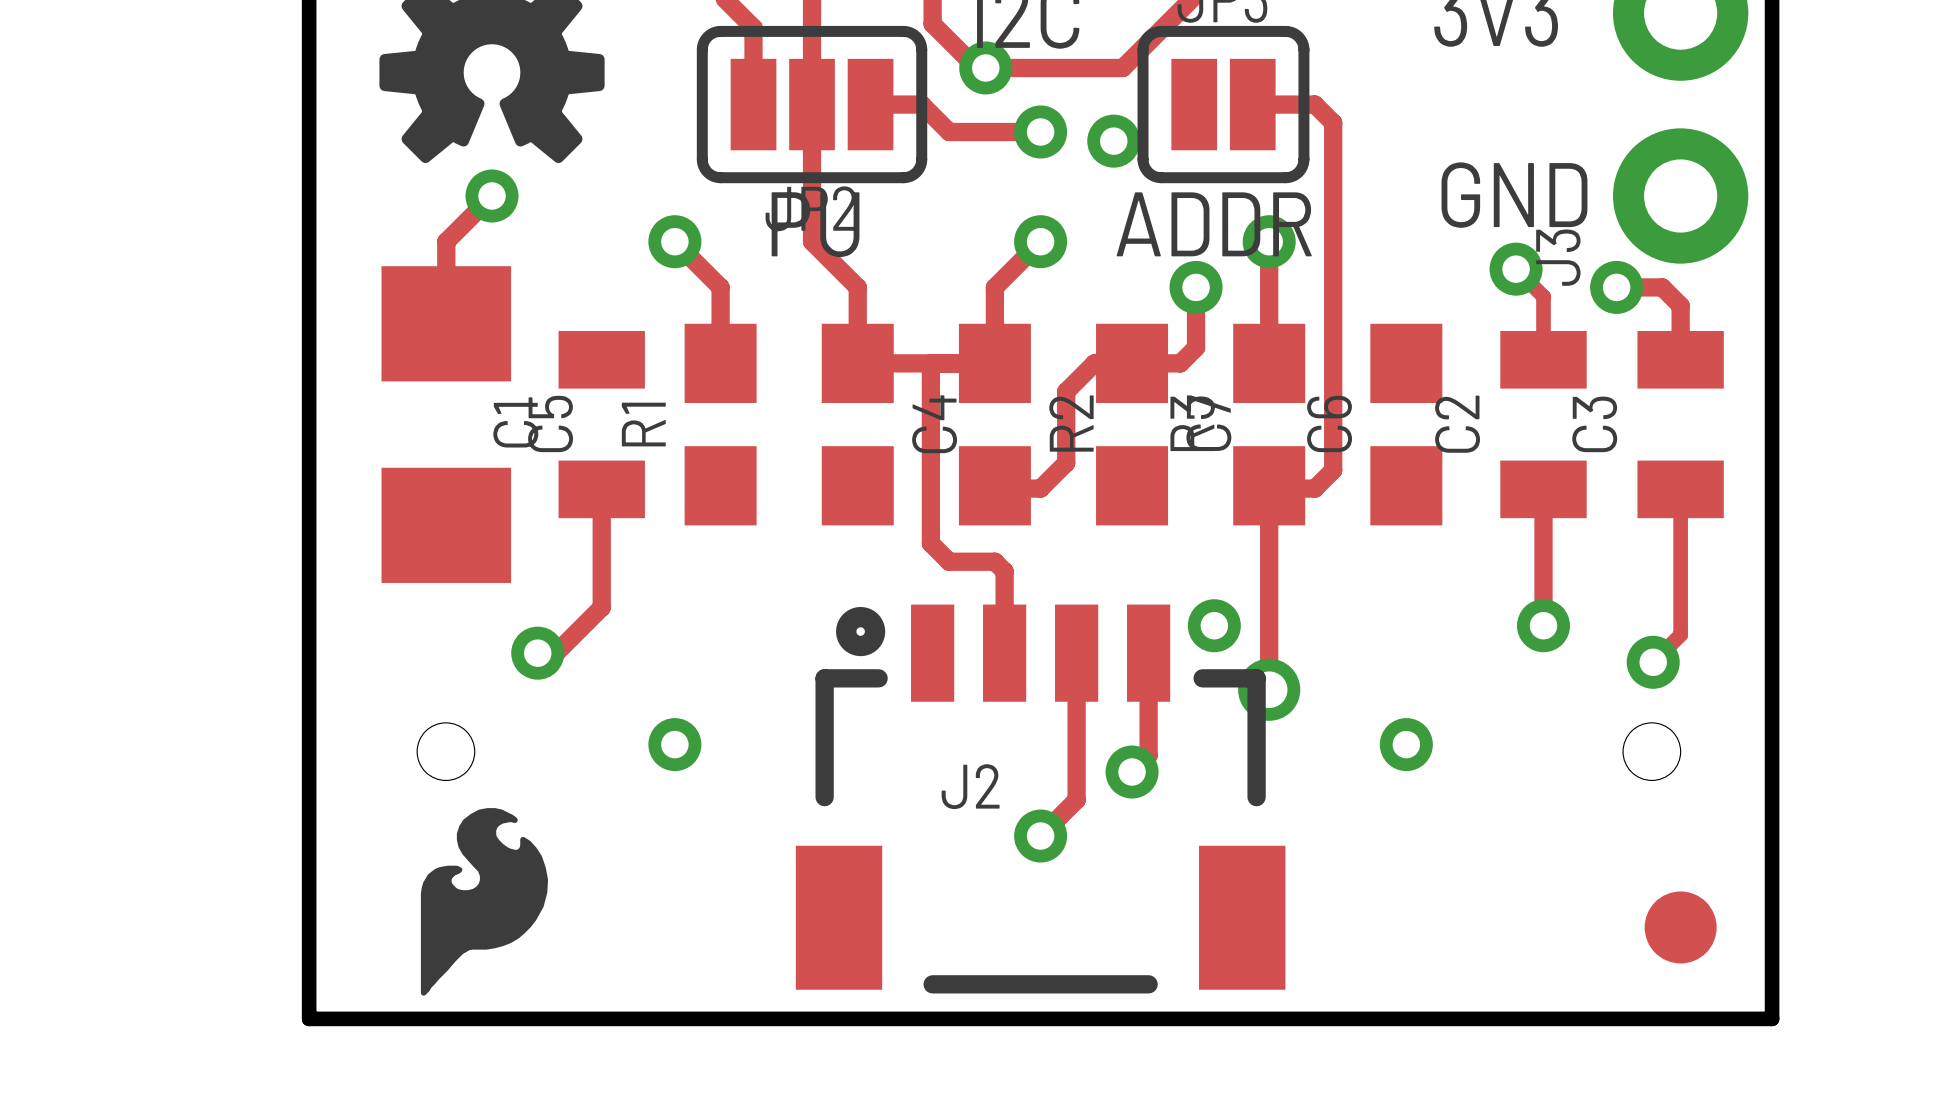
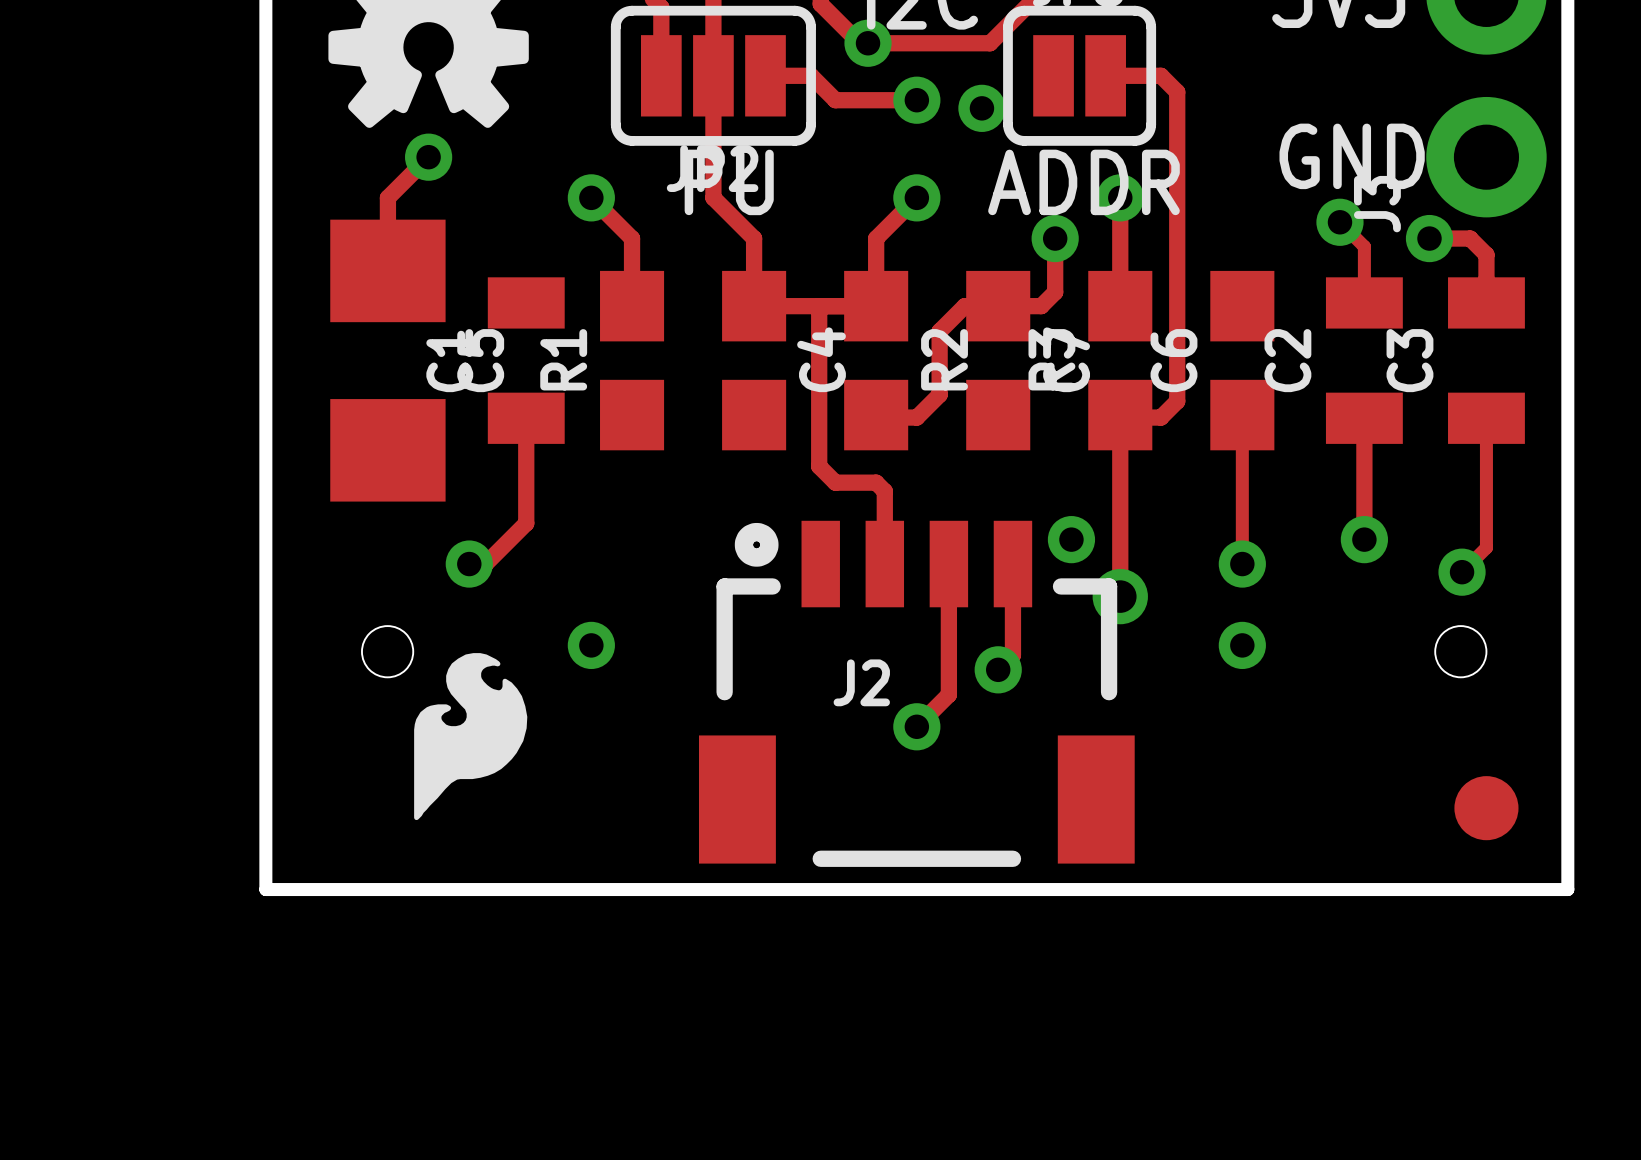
track: none -> (1242, 415) (1242, 564)
via: none -> (1242, 564)
drawing position: (484, 901) -> (470, 736)

